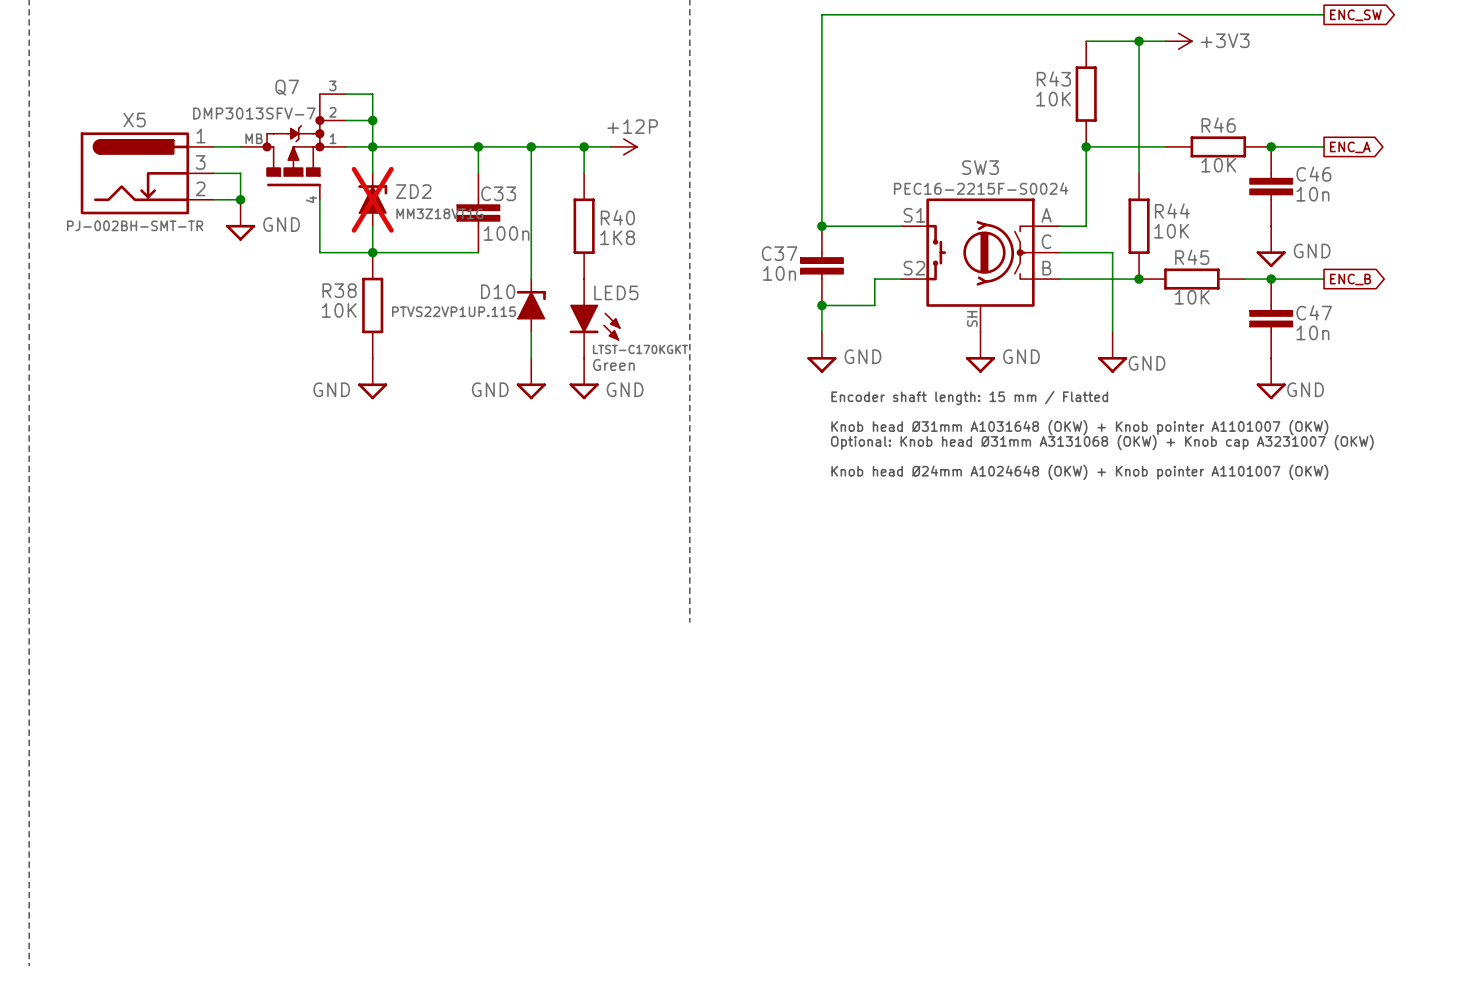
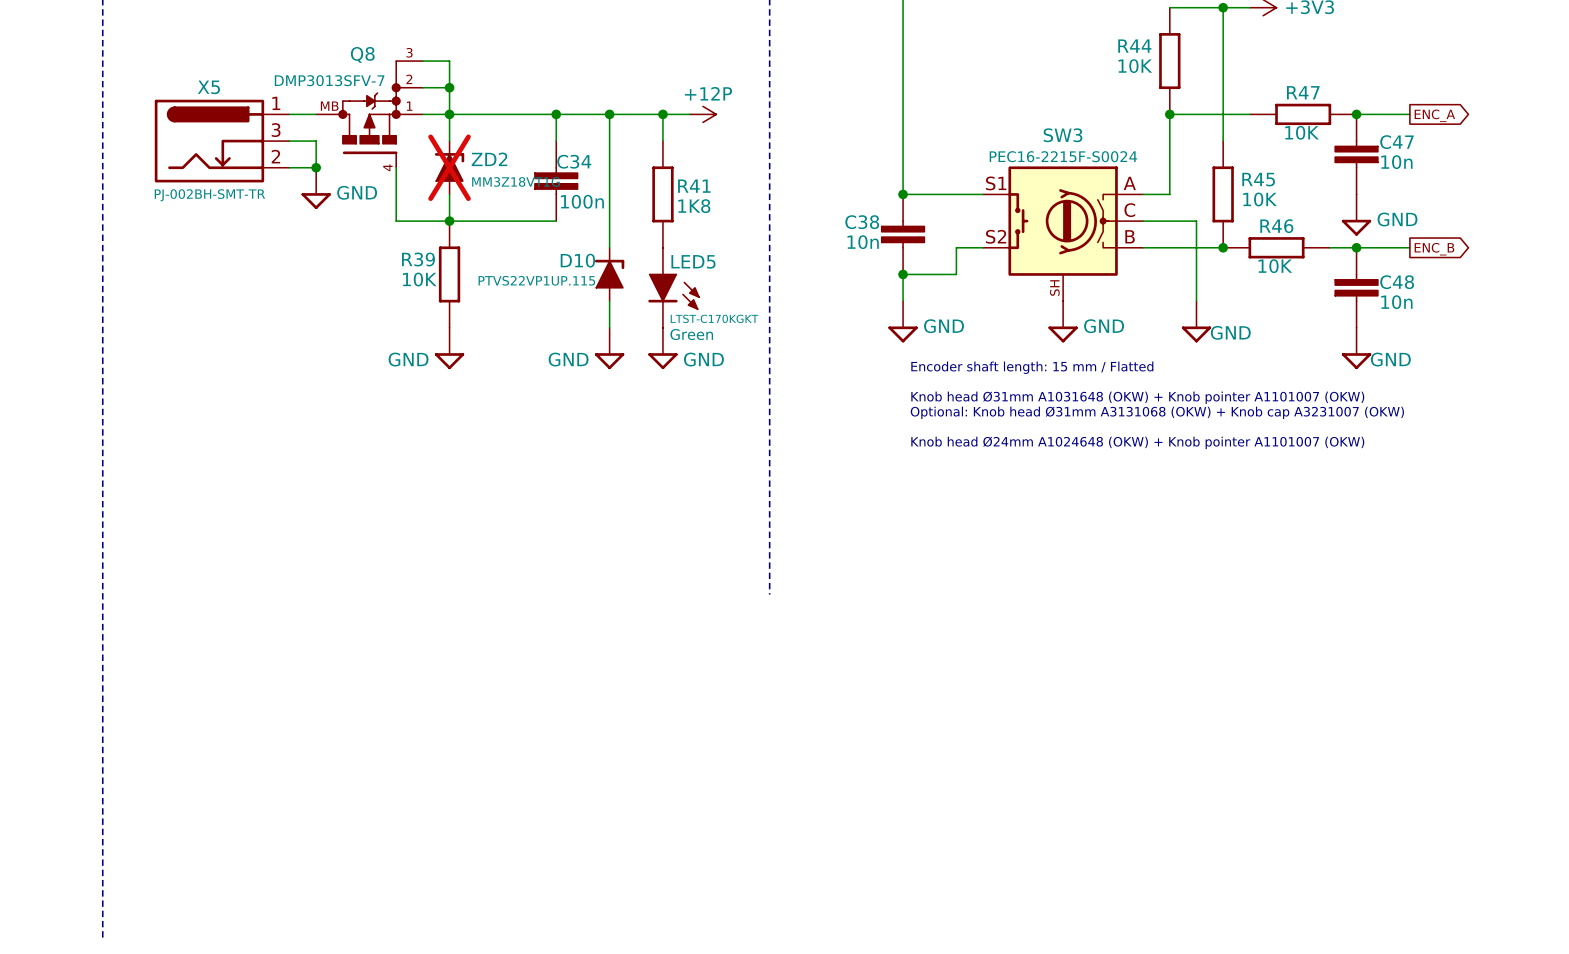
R43 name: R43 (1053, 78) -> R44 (1134, 46)
Q7 name: Q7 (287, 87) -> Q8 (362, 54)
R46 name: R46 (1218, 125) -> R47 (1303, 92)
C46 name: C46 (1313, 174) -> C47 (1396, 142)
C33 name: C33 (498, 193) -> C34 (574, 161)
R44 name: R44 (1172, 211) -> R45 (1258, 179)
R40 name: R40 (617, 217) -> R41 (694, 186)
C37 name: C37 (779, 253) -> C38 (862, 222)
R45 name: R45 (1192, 257) -> R46 (1276, 226)
R38 name: R38 (339, 290) -> R39 (418, 259)
C47 name: C47 (1314, 312) -> C48 (1397, 282)

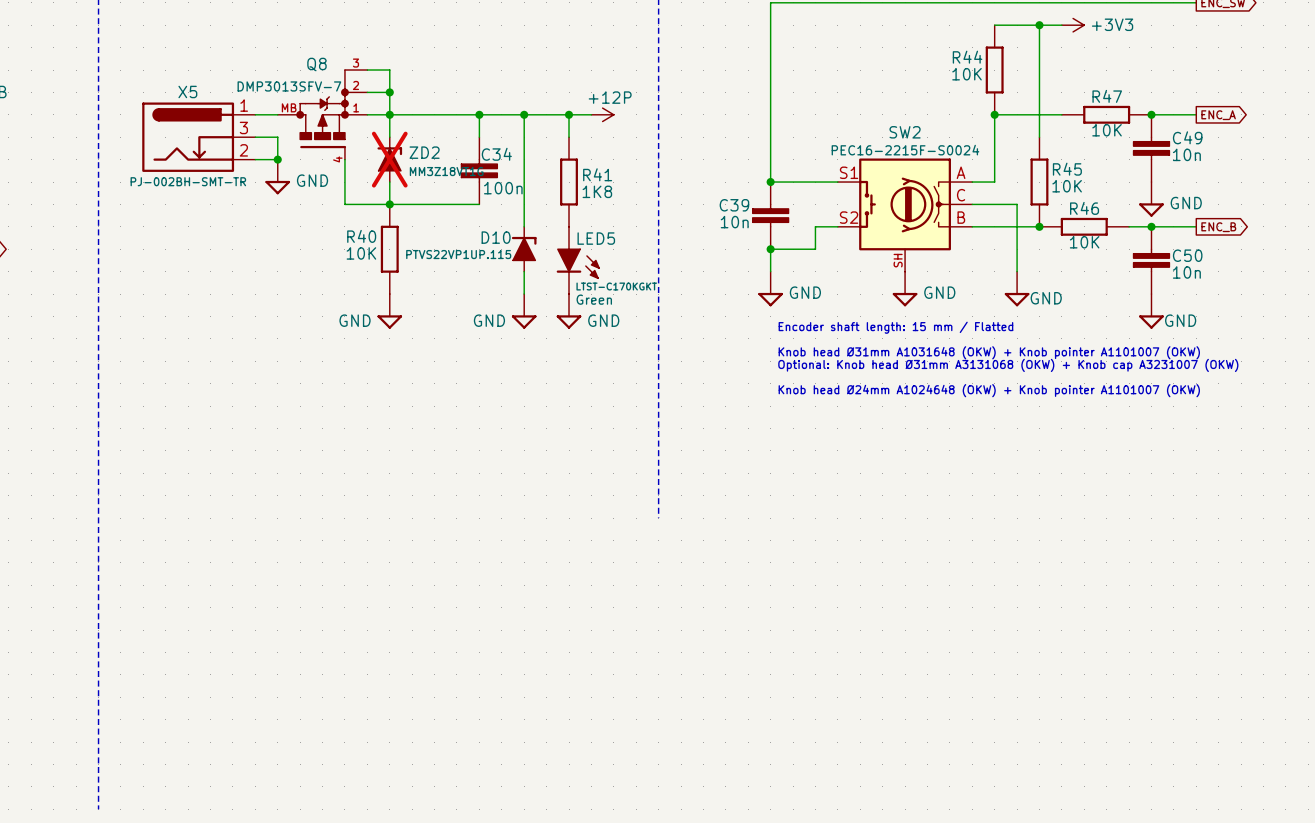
SW3 name: SW3 (1062, 135) -> SW2 (905, 132)
C47 name: C47 (1396, 142) -> C49 (1187, 137)
C38 name: C38 (862, 222) -> C39 (734, 205)
R39 name: R39 (418, 259) -> R40 (361, 236)
C48 name: C48 (1397, 282) -> C50 (1187, 255)

